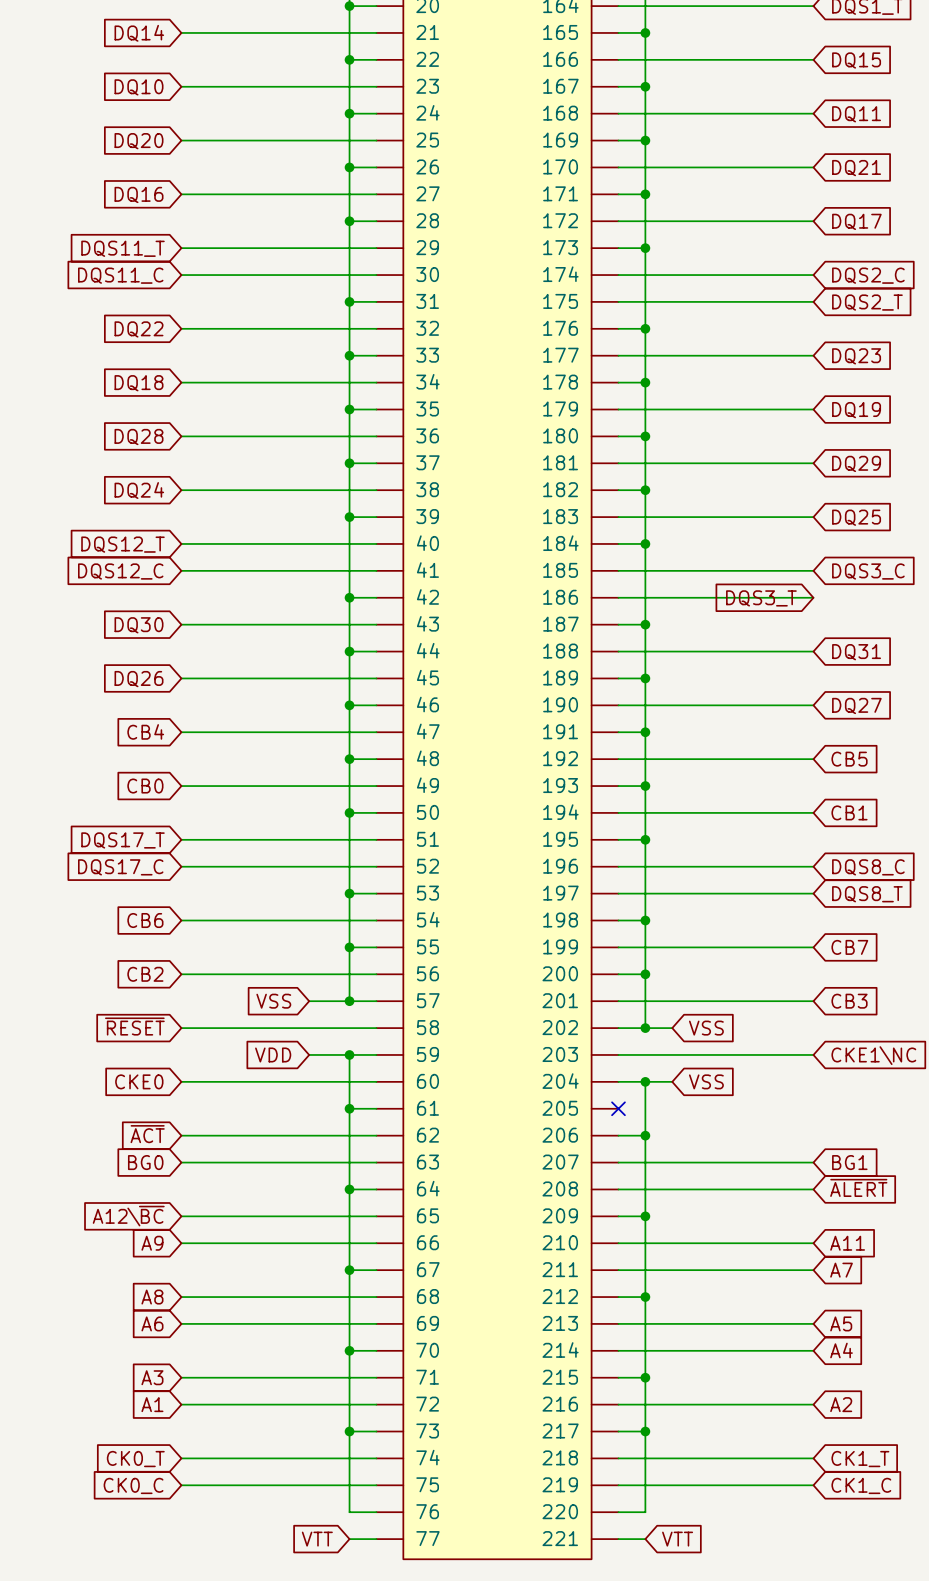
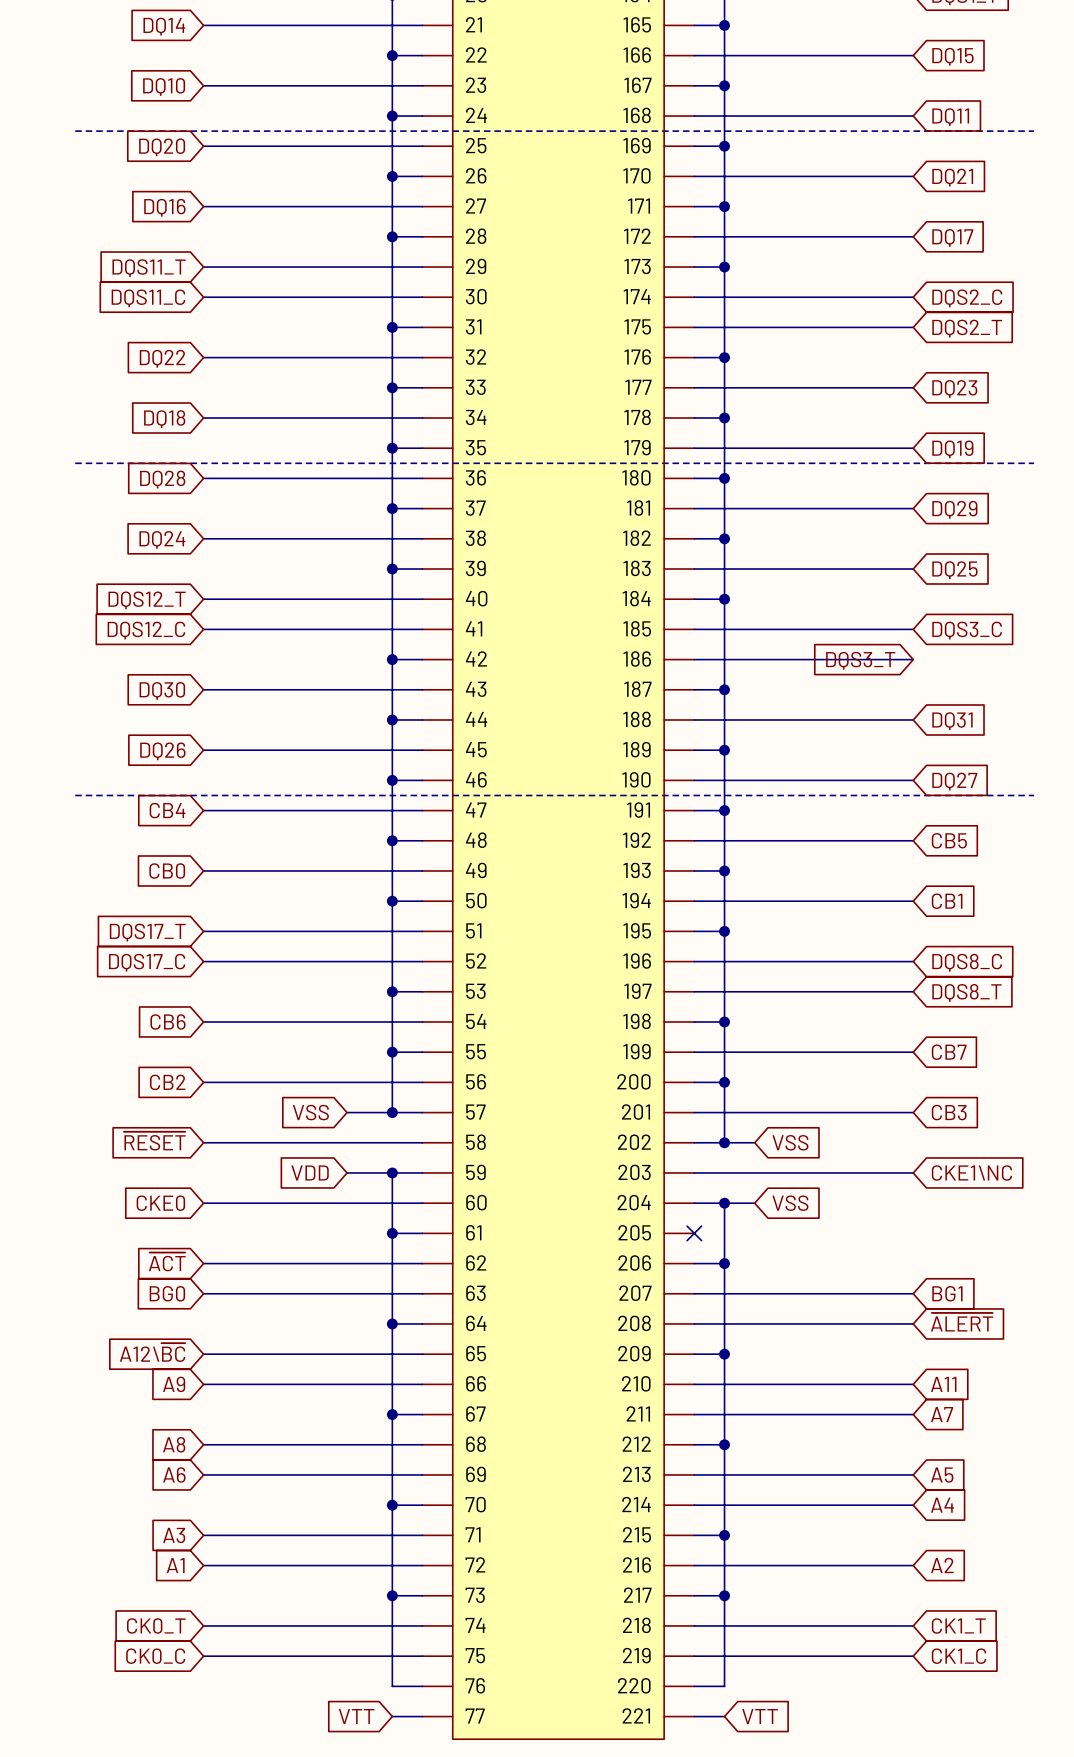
line: none -> (75, 131) (1034, 131)
line: none -> (75, 463) (1034, 463)
line: none -> (75, 795) (1034, 795)

